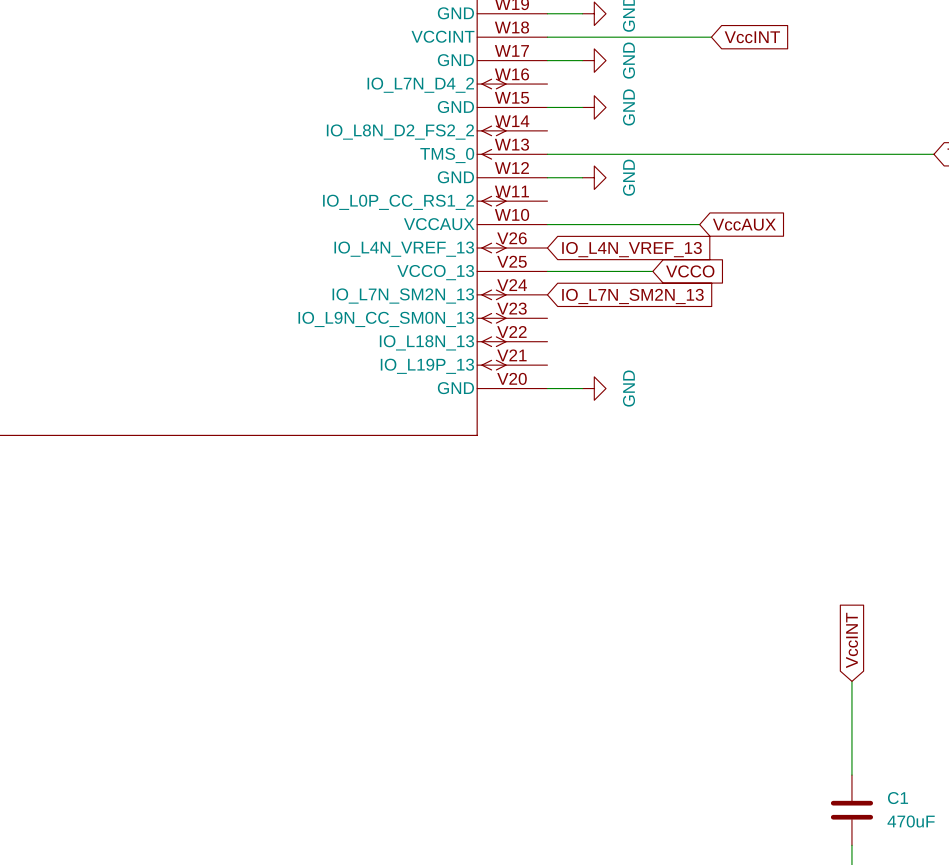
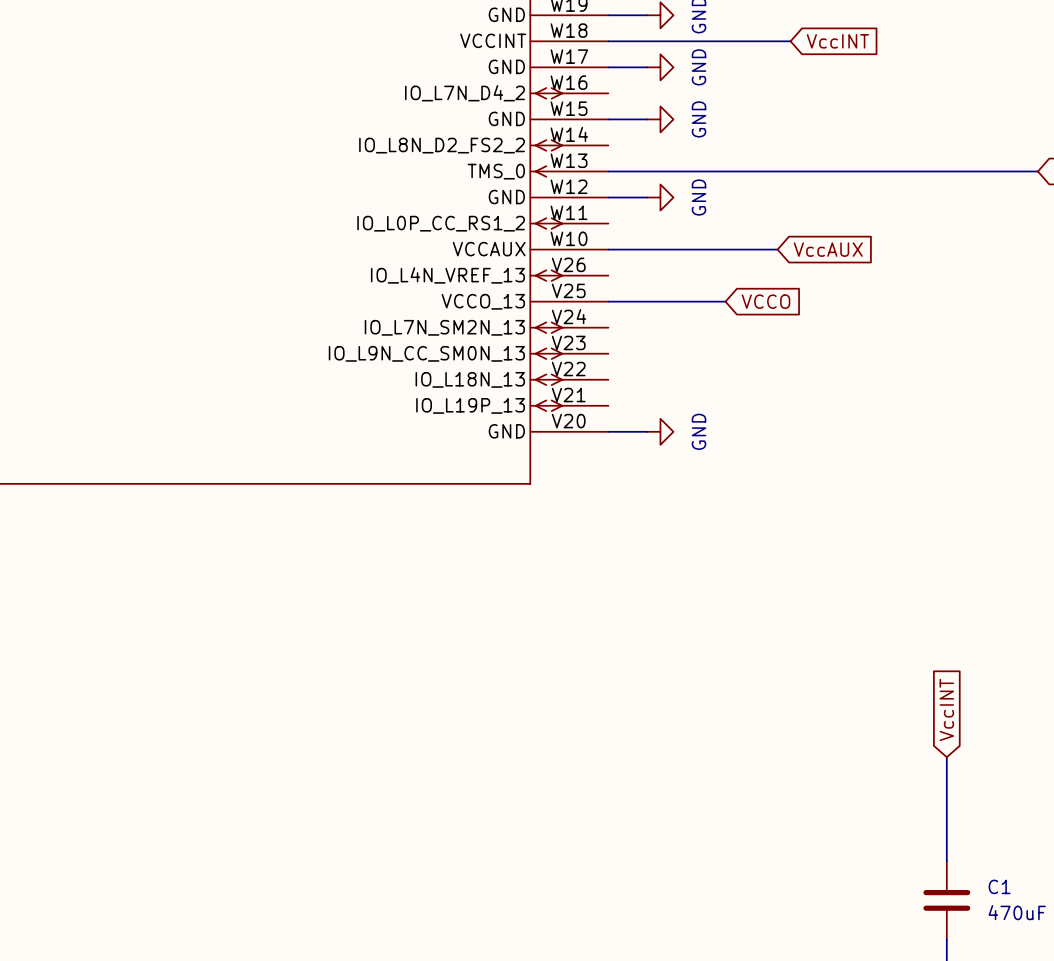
global label: IO_L4N_VREF_13 (632, 249) -> none
global label: IO_L7N_SM2N_13 (632, 296) -> none

